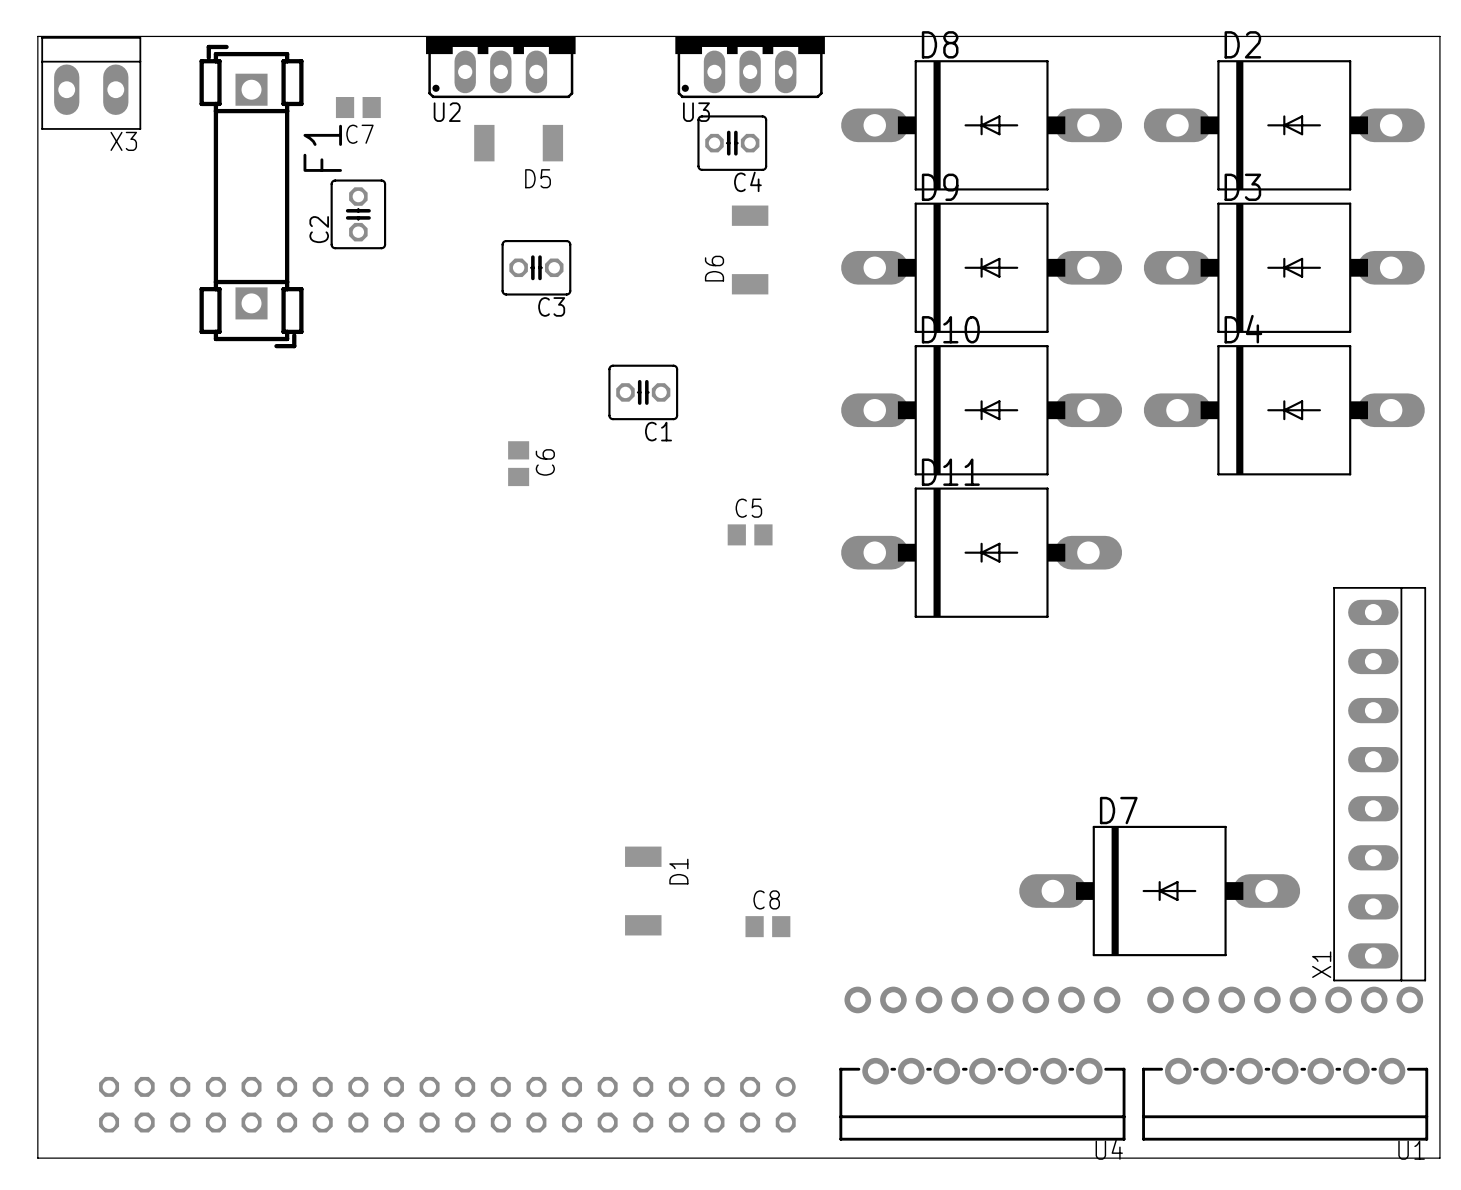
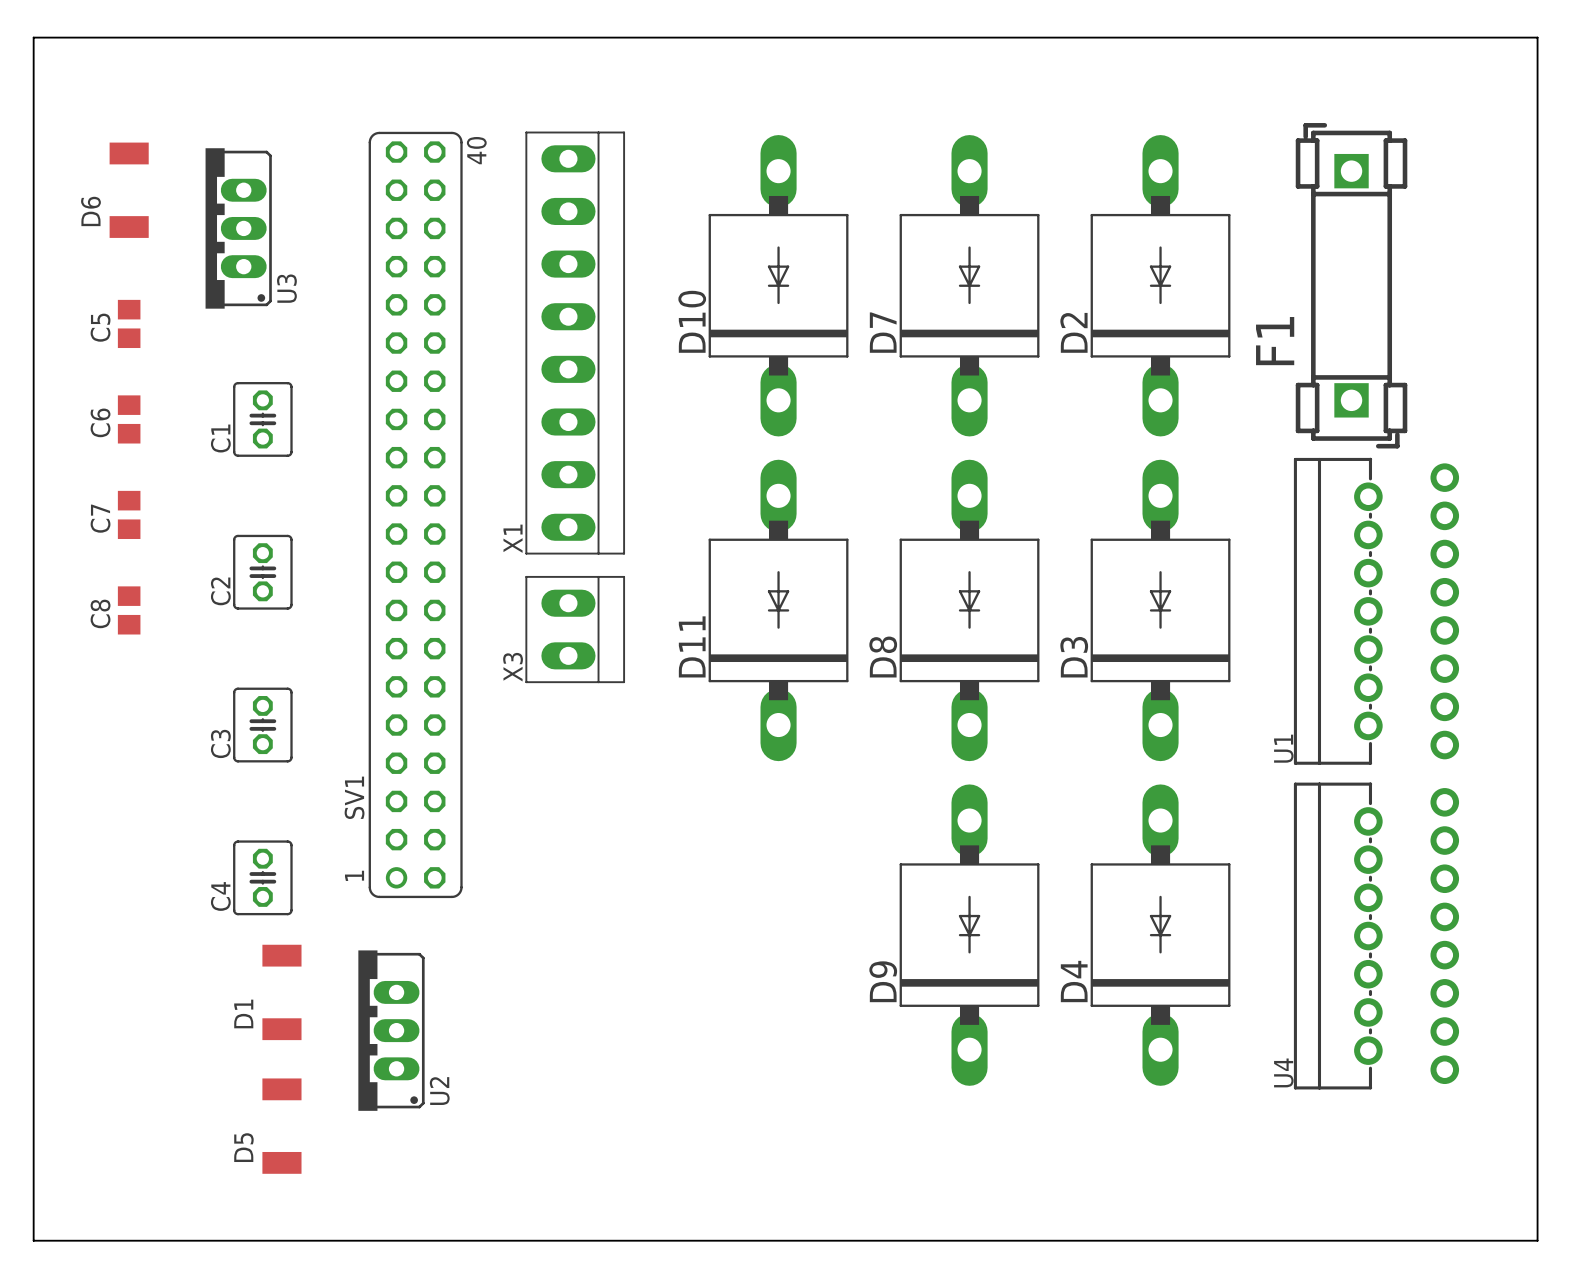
U2 rotation: 0° (500, 67) -> 90° counterclockwise (391, 1030)
U2 position: (500, 67) -> (391, 1030)
U3 rotation: 0° (750, 67) -> 90° counterclockwise (238, 228)
U3 position: (750, 67) -> (238, 228)
X3 rotation: 0° (91, 83) -> 90° clockwise (575, 629)
X3 position: (91, 83) -> (575, 629)
C7 rotation: 0° (358, 107) -> 90° clockwise (129, 514)
C7 position: (358, 107) -> (129, 514)
D8 rotation: 0° (981, 125) -> 90° counterclockwise (969, 610)
D8 position: (981, 125) -> (969, 610)
D2 rotation: 0° (1284, 125) -> 90° counterclockwise (1160, 285)
D2 position: (1284, 125) -> (1160, 285)
D5 rotation: 0° (518, 143) -> 90° clockwise (281, 1126)
D5 position: (518, 143) -> (281, 1126)
C4 rotation: 0° (732, 143) -> 90° clockwise (262, 877)
C4 position: (732, 143) -> (262, 877)
F1 name position: F1 (322, 148) -> F1 (1275, 341)
F1 position: (251, 196) -> (1351, 285)
C2 position: (358, 214) -> (262, 572)
D6 position: (750, 249) -> (129, 190)
C3 rotation: 0° (536, 267) -> 90° clockwise (262, 725)
C3 position: (536, 267) -> (262, 725)
D9 rotation: 0° (981, 267) -> 90° counterclockwise (969, 935)
D9 position: (981, 267) -> (969, 935)
D3 rotation: 0° (1284, 267) -> 90° counterclockwise (1160, 610)
D3 position: (1284, 267) -> (1160, 610)
C1 rotation: 0° (643, 392) -> 90° clockwise (262, 419)
C1 position: (643, 392) -> (262, 419)
D10 rotation: 0° (981, 410) -> 90° counterclockwise (778, 285)
D10 position: (981, 410) -> (778, 285)
D4 rotation: 0° (1284, 410) -> 90° counterclockwise (1160, 935)
D4 position: (1284, 410) -> (1160, 935)
C6 name position: C6 (545, 462) -> C6 (100, 422)
C6 position: (518, 463) -> (129, 419)
SV1: none -> (415, 514)
C5 name position: C5 (748, 508) -> C5 (100, 327)
C5 rotation: 0° (750, 534) -> 90° clockwise (129, 323)
C5 position: (750, 534) -> (129, 323)
D11 rotation: 0° (981, 552) -> 90° counterclockwise (778, 610)
D11 position: (981, 552) -> (778, 610)
X1 position: (1379, 784) -> (575, 343)
D1 name position: D1 (678, 871) -> D1 (243, 1013)
D1 position: (643, 891) -> (281, 992)
D7 rotation: 0° (1159, 891) -> 90° counterclockwise (969, 285)
D7 position: (1159, 891) -> (969, 285)
C8 name position: C8 (766, 899) -> C8 (100, 613)
C8 rotation: 0° (767, 926) -> 90° clockwise (129, 610)
C8 position: (767, 926) -> (129, 610)
U4 rotation: 0° (982, 1063) -> 90° clockwise (1376, 935)
U4 position: (982, 1063) -> (1376, 935)
U1 rotation: 0° (1285, 1063) -> 90° clockwise (1376, 611)
U1 position: (1285, 1063) -> (1376, 611)
part: (447, 1104) -> none

